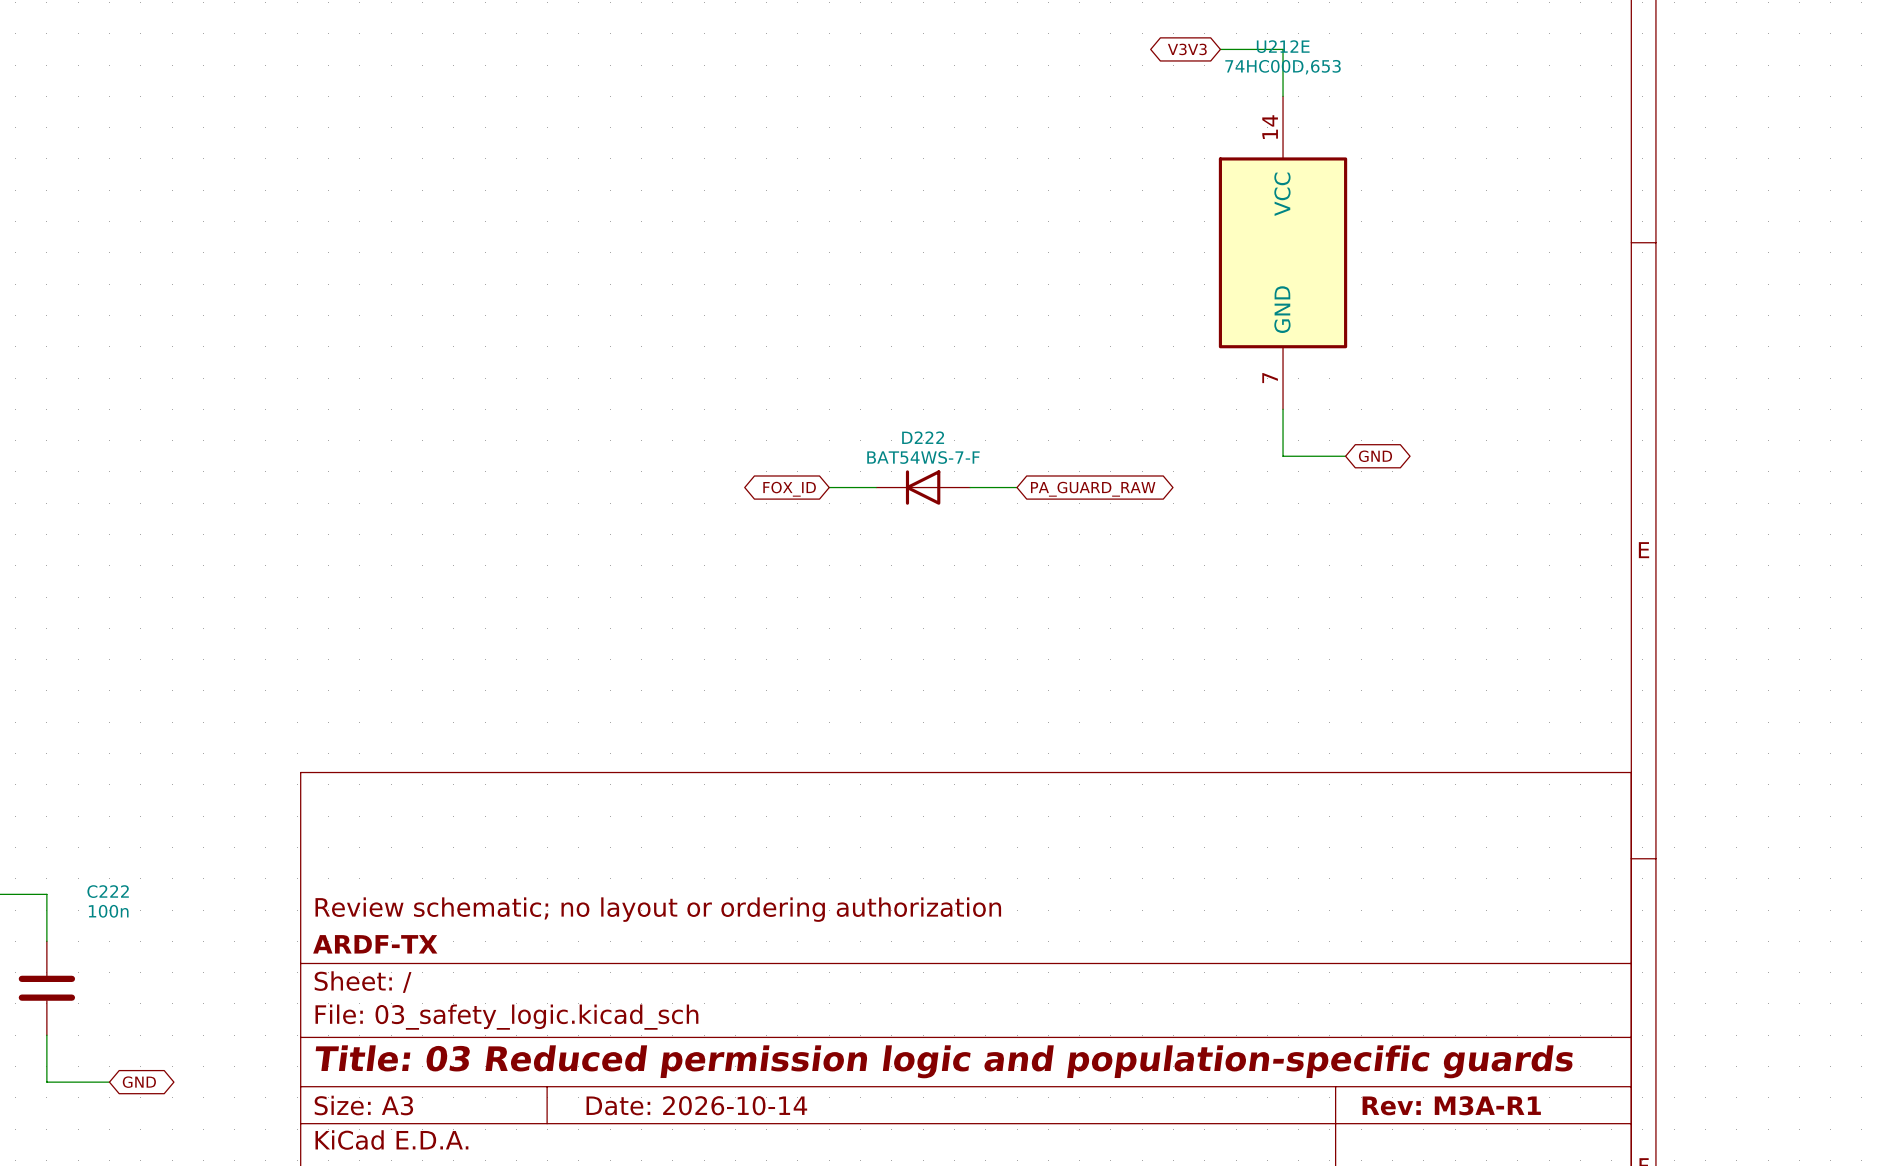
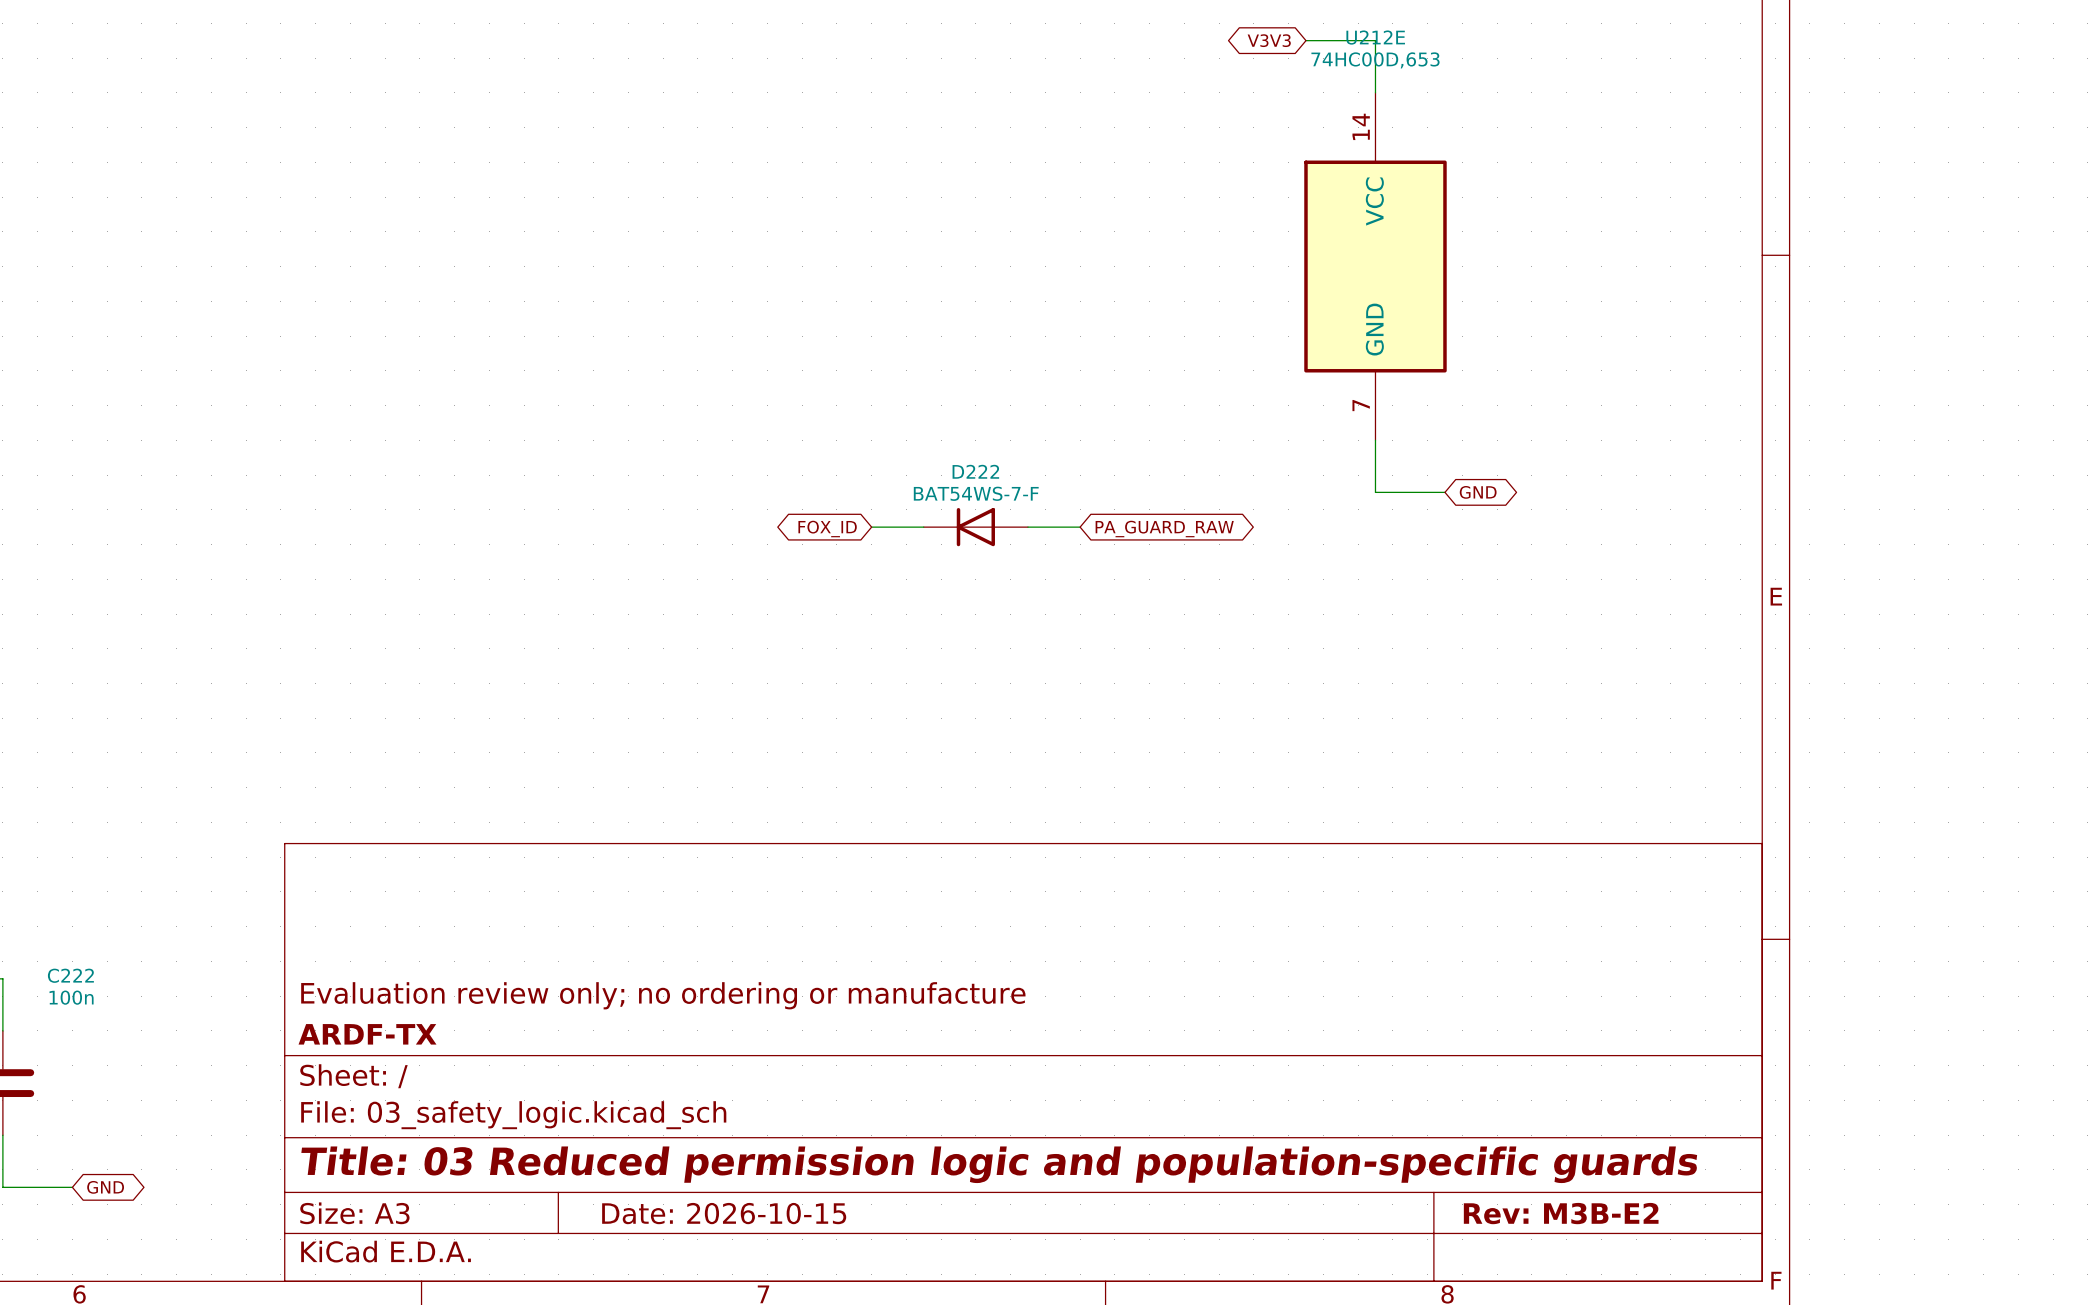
title block: Review schematic; no layout or ordering authorization (658, 909) -> Evaluation review only; no ordering or manufacture (663, 995)
title block: Date: 2026-10-14 (696, 1105) -> Date: 2026-10-15 (724, 1213)
title block: Rev: M3A-R1 (1451, 1105) -> Rev: M3B-E2 (1561, 1213)

